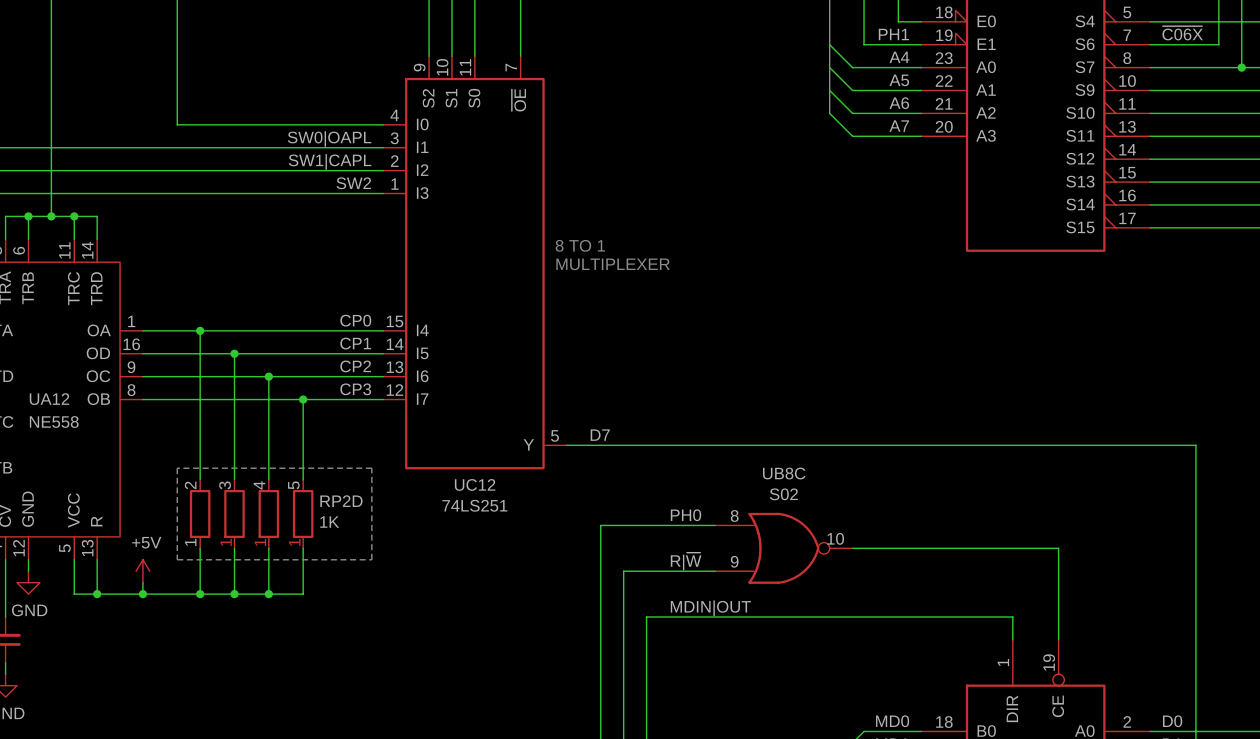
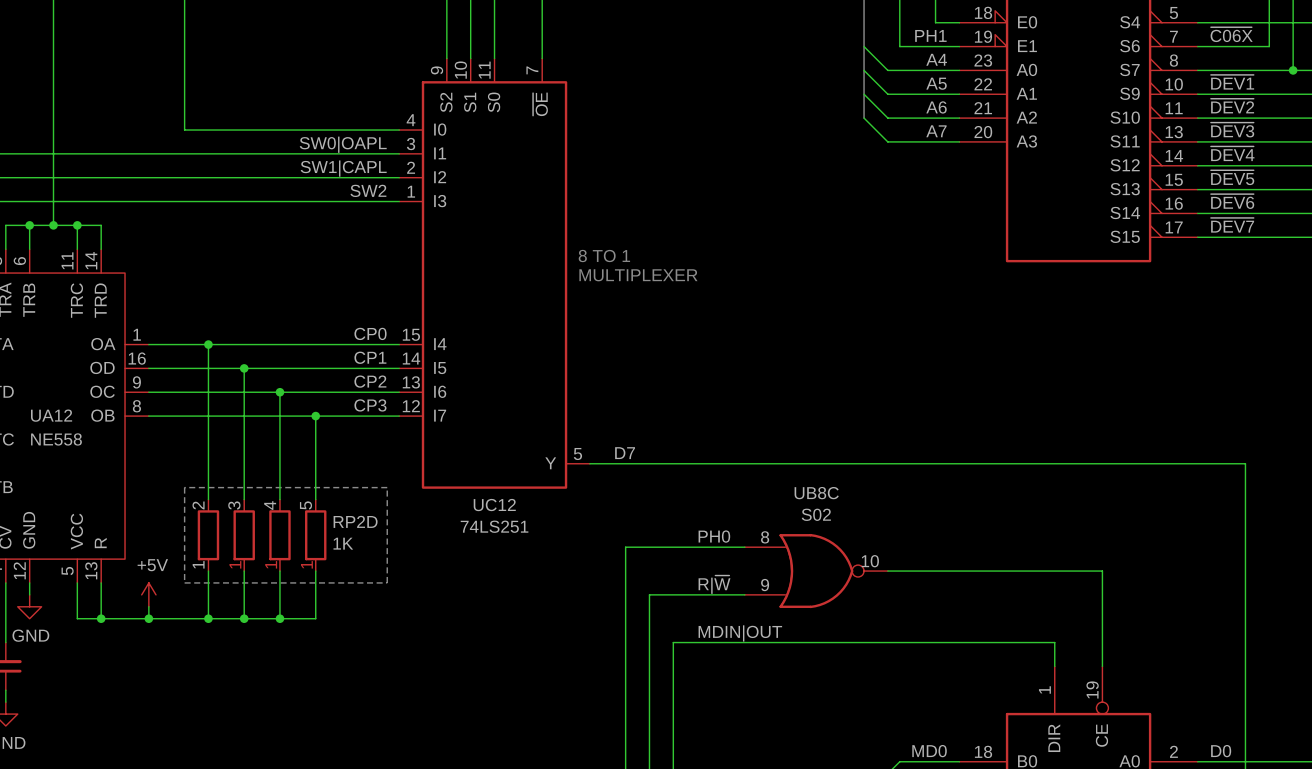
label: none -> ~{DEV1} (1232, 82)
label: none -> ~{DEV2} (1232, 106)
label: none -> ~{DEV3} (1232, 130)
label: none -> ~{DEV4} (1232, 153)
label: none -> ~{DEV5} (1232, 177)
label: none -> ~{DEV6} (1232, 201)
label: none -> ~{DEV7} (1232, 225)

